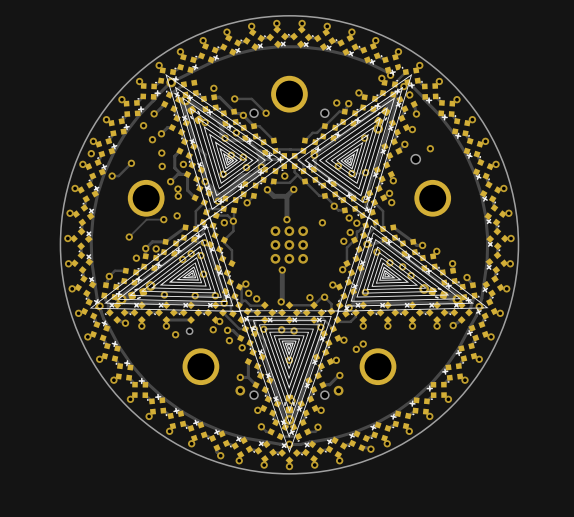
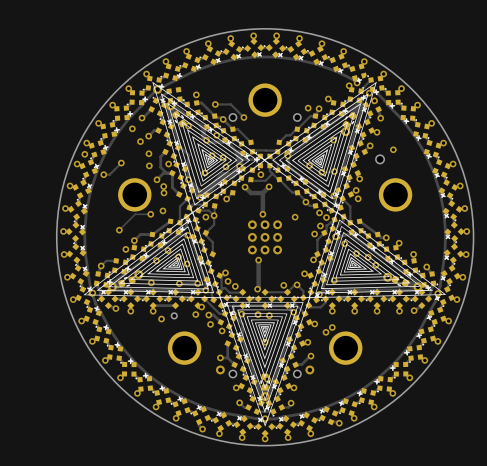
via: (156, 248) -> none
via: (191, 253) -> none
via: (200, 255) -> none
via: none -> (178, 257)
via: none -> (156, 260)

